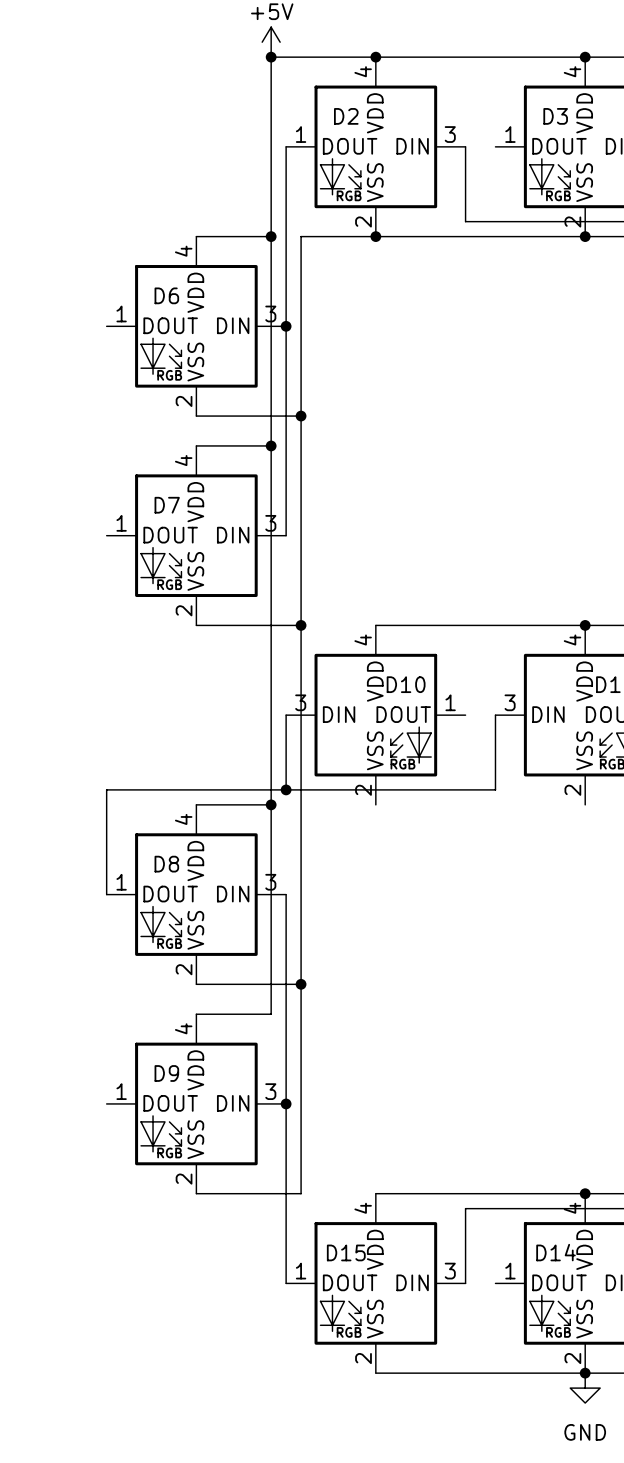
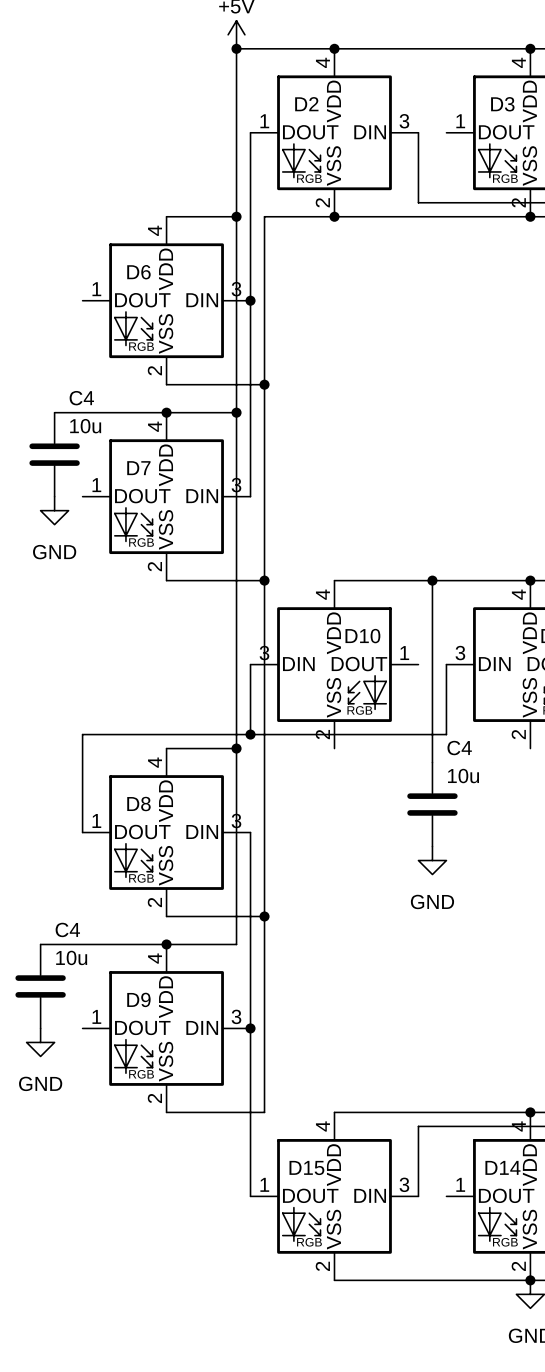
wire: none -> (54, 412) (166, 412)
junction: none -> (166, 412)
C4: none -> 10u (54, 454)
power symbol: none -> GND (54, 510)
wire: none -> (432, 580) (432, 762)
junction: none -> (432, 580)
C4: none -> 10u (432, 804)
power symbol: none -> GND (432, 860)
wire: none -> (40, 944) (166, 944)
junction: none -> (166, 944)
C4: none -> 10u (40, 986)
power symbol: none -> GND (40, 1042)

